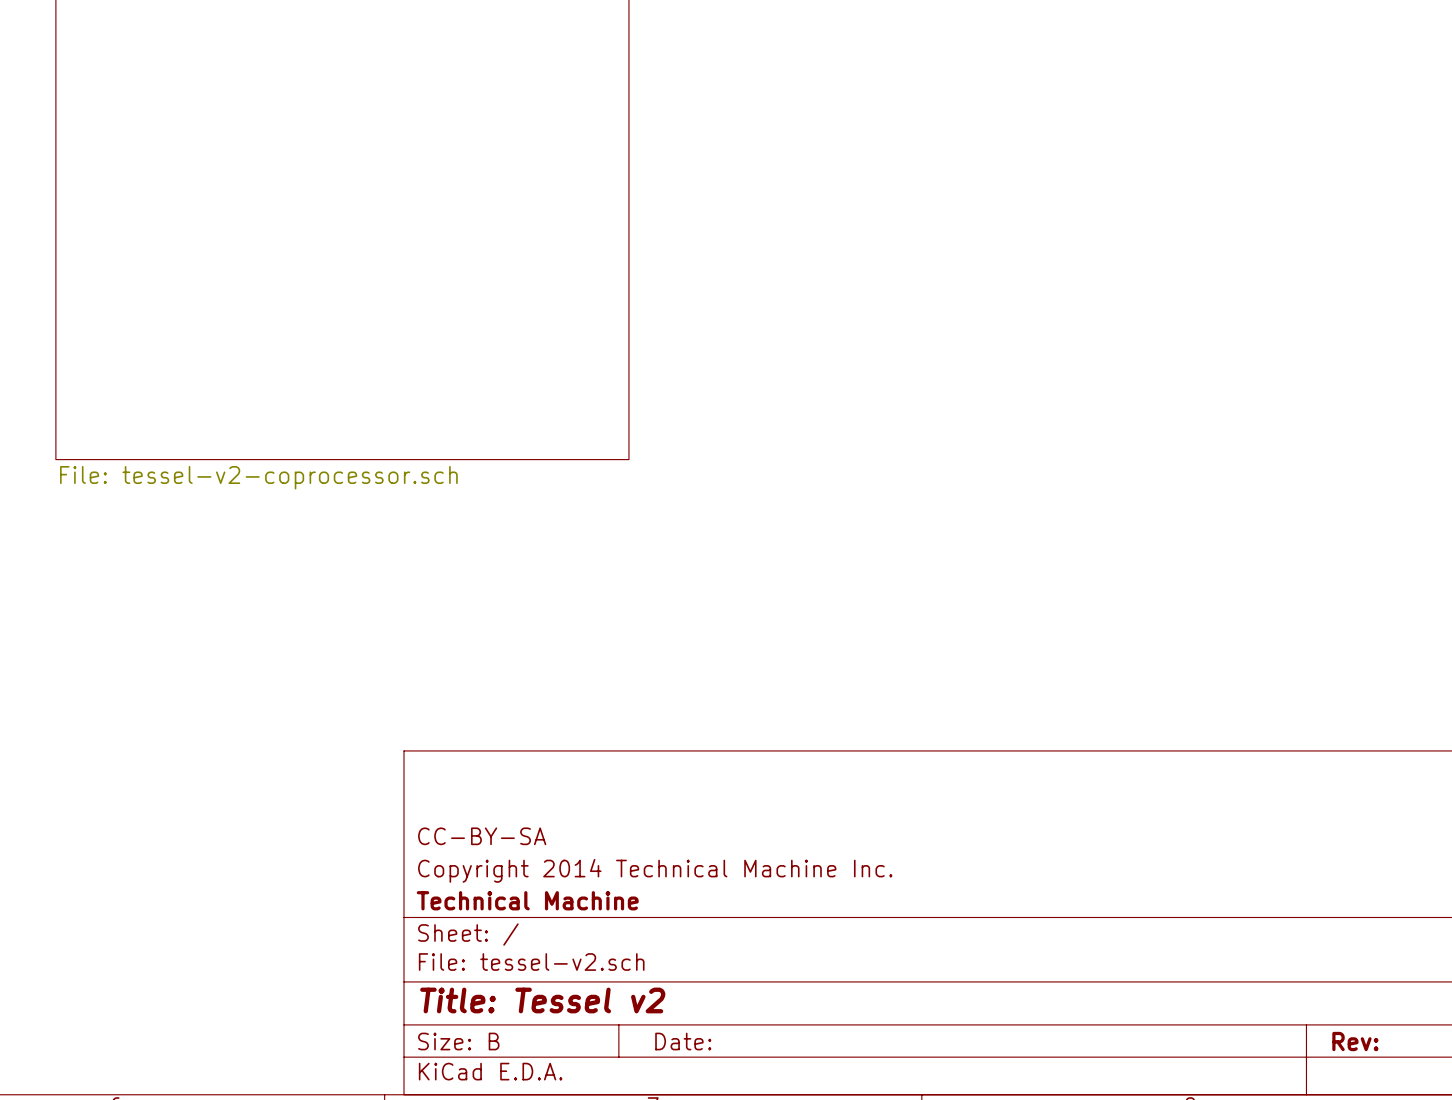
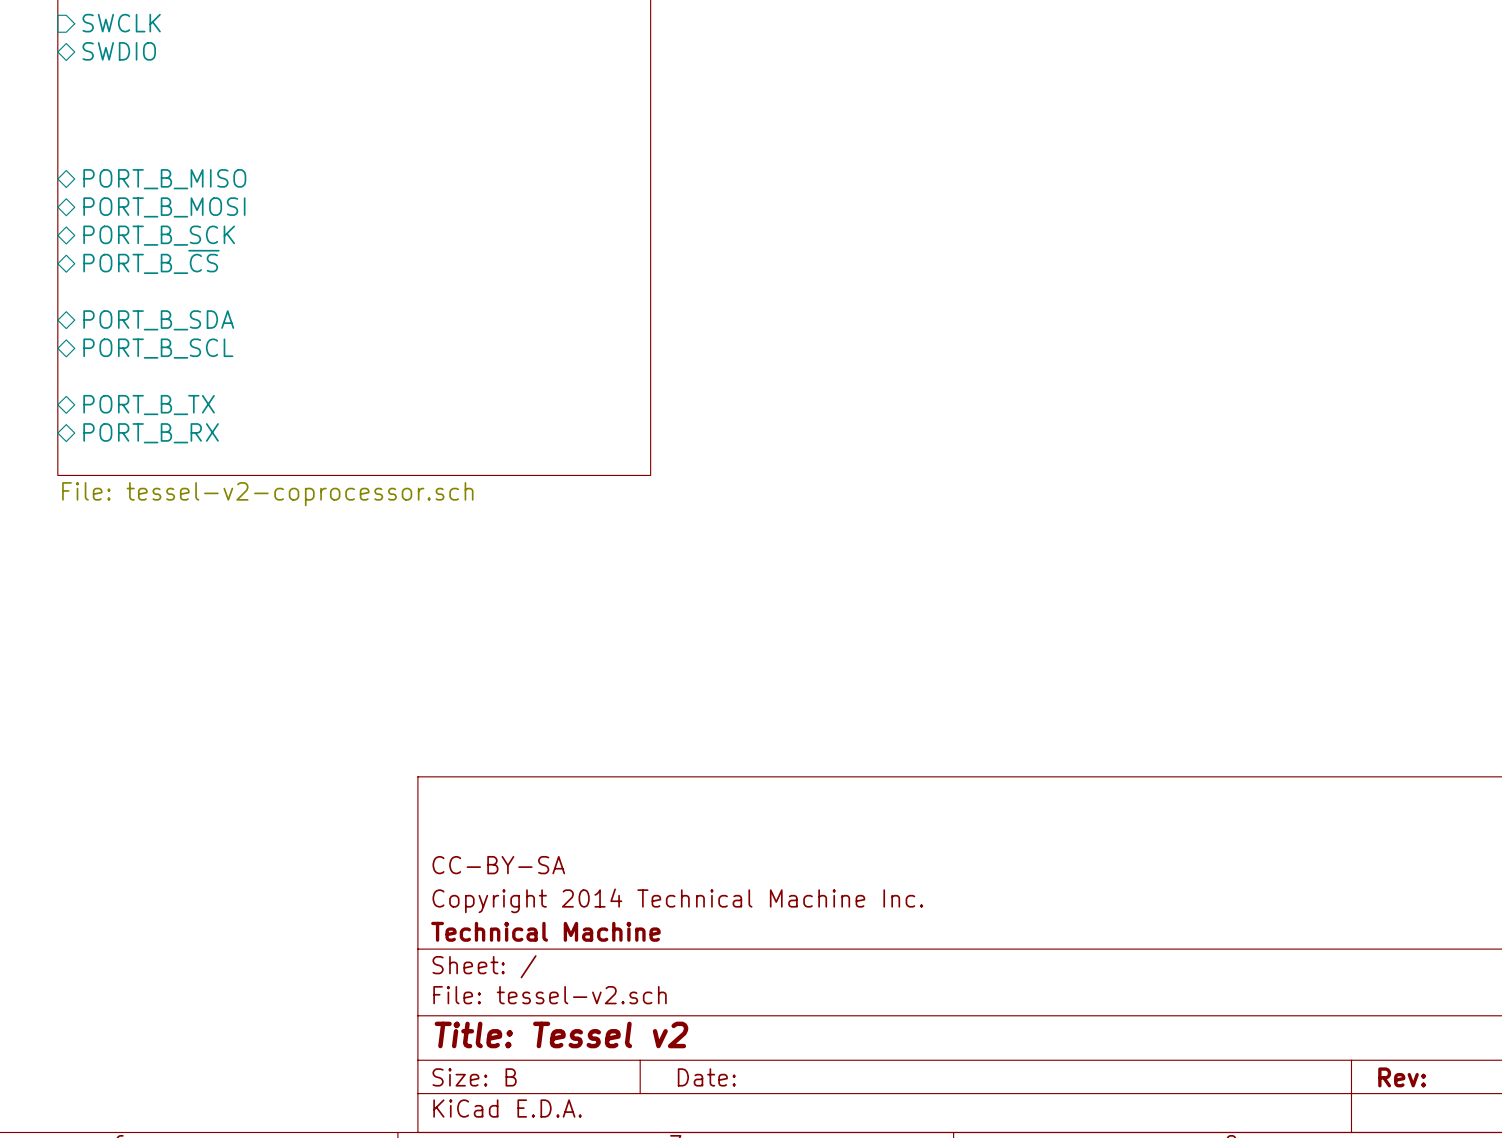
sheet pin: none -> SWCLK (121, 23)
sheet pin: none -> SWDIO (119, 51)
sheet pin: none -> PORT_B_MISO (164, 179)
sheet pin: none -> PORT_B_MOSI (164, 207)
sheet pin: none -> PORT_B_SCK (159, 235)
sheet pin: none -> PORT_B_~{CS} (151, 261)
sheet pin: none -> PORT_B_SDA (158, 320)
sheet pin: none -> PORT_B_SCL (158, 348)
sheet pin: none -> PORT_B_TX (149, 405)
sheet pin: none -> PORT_B_RX (151, 433)

